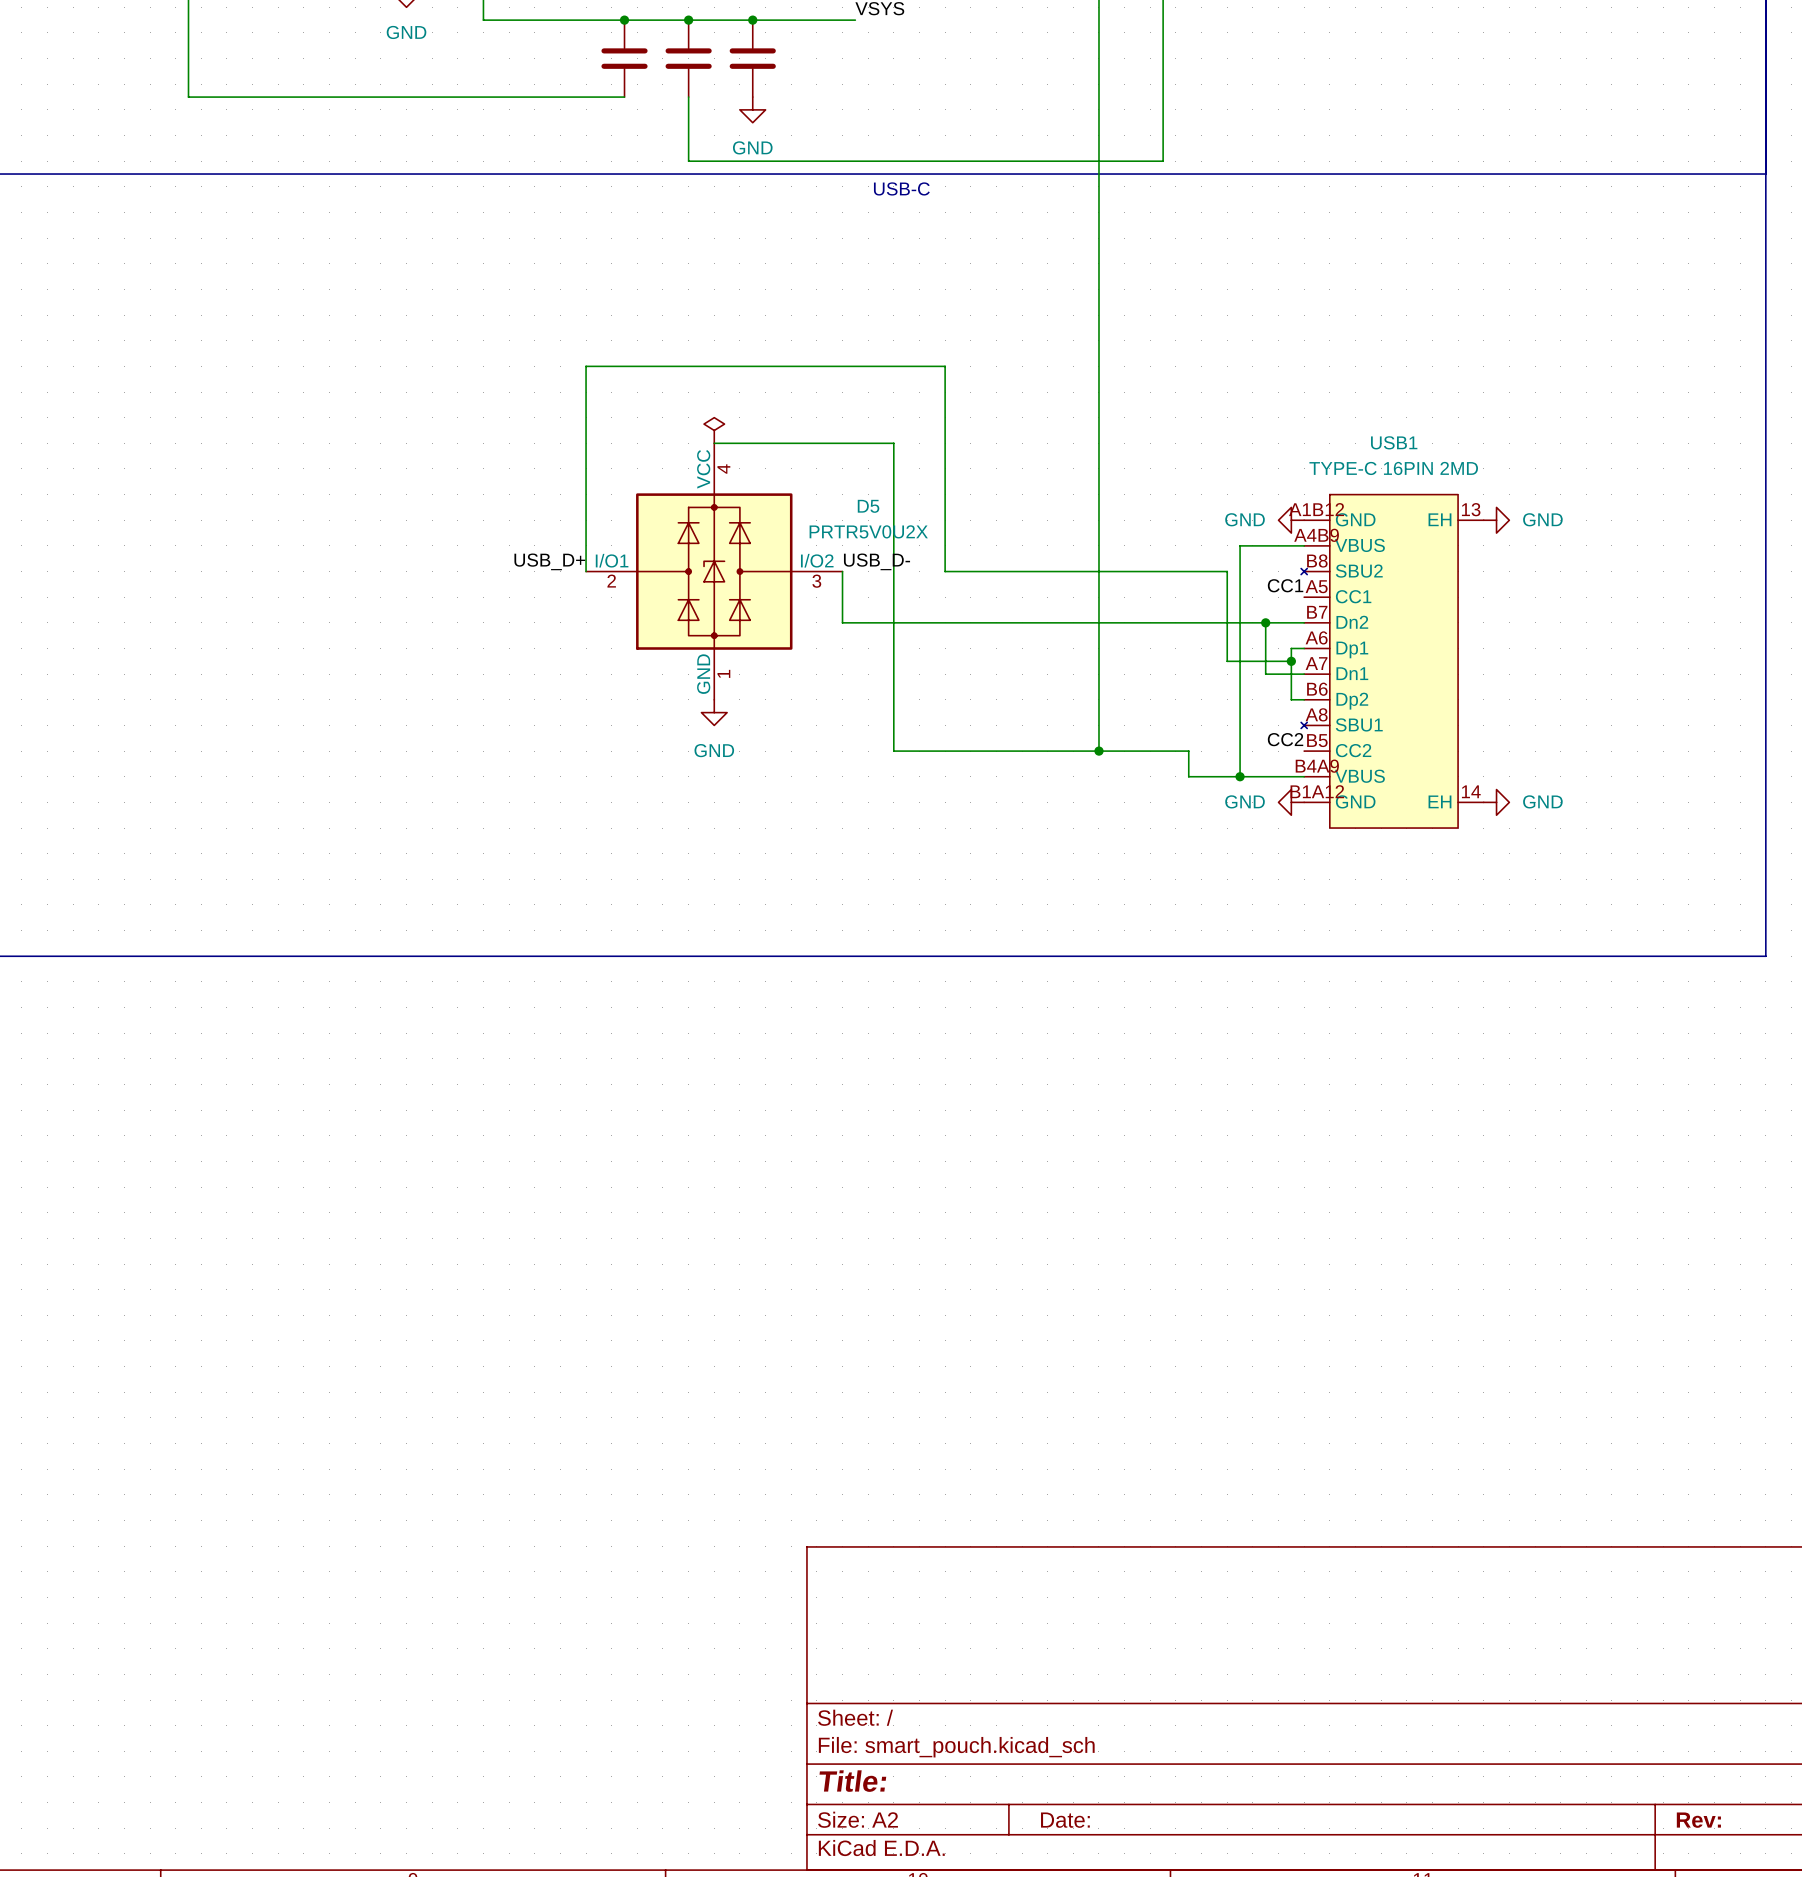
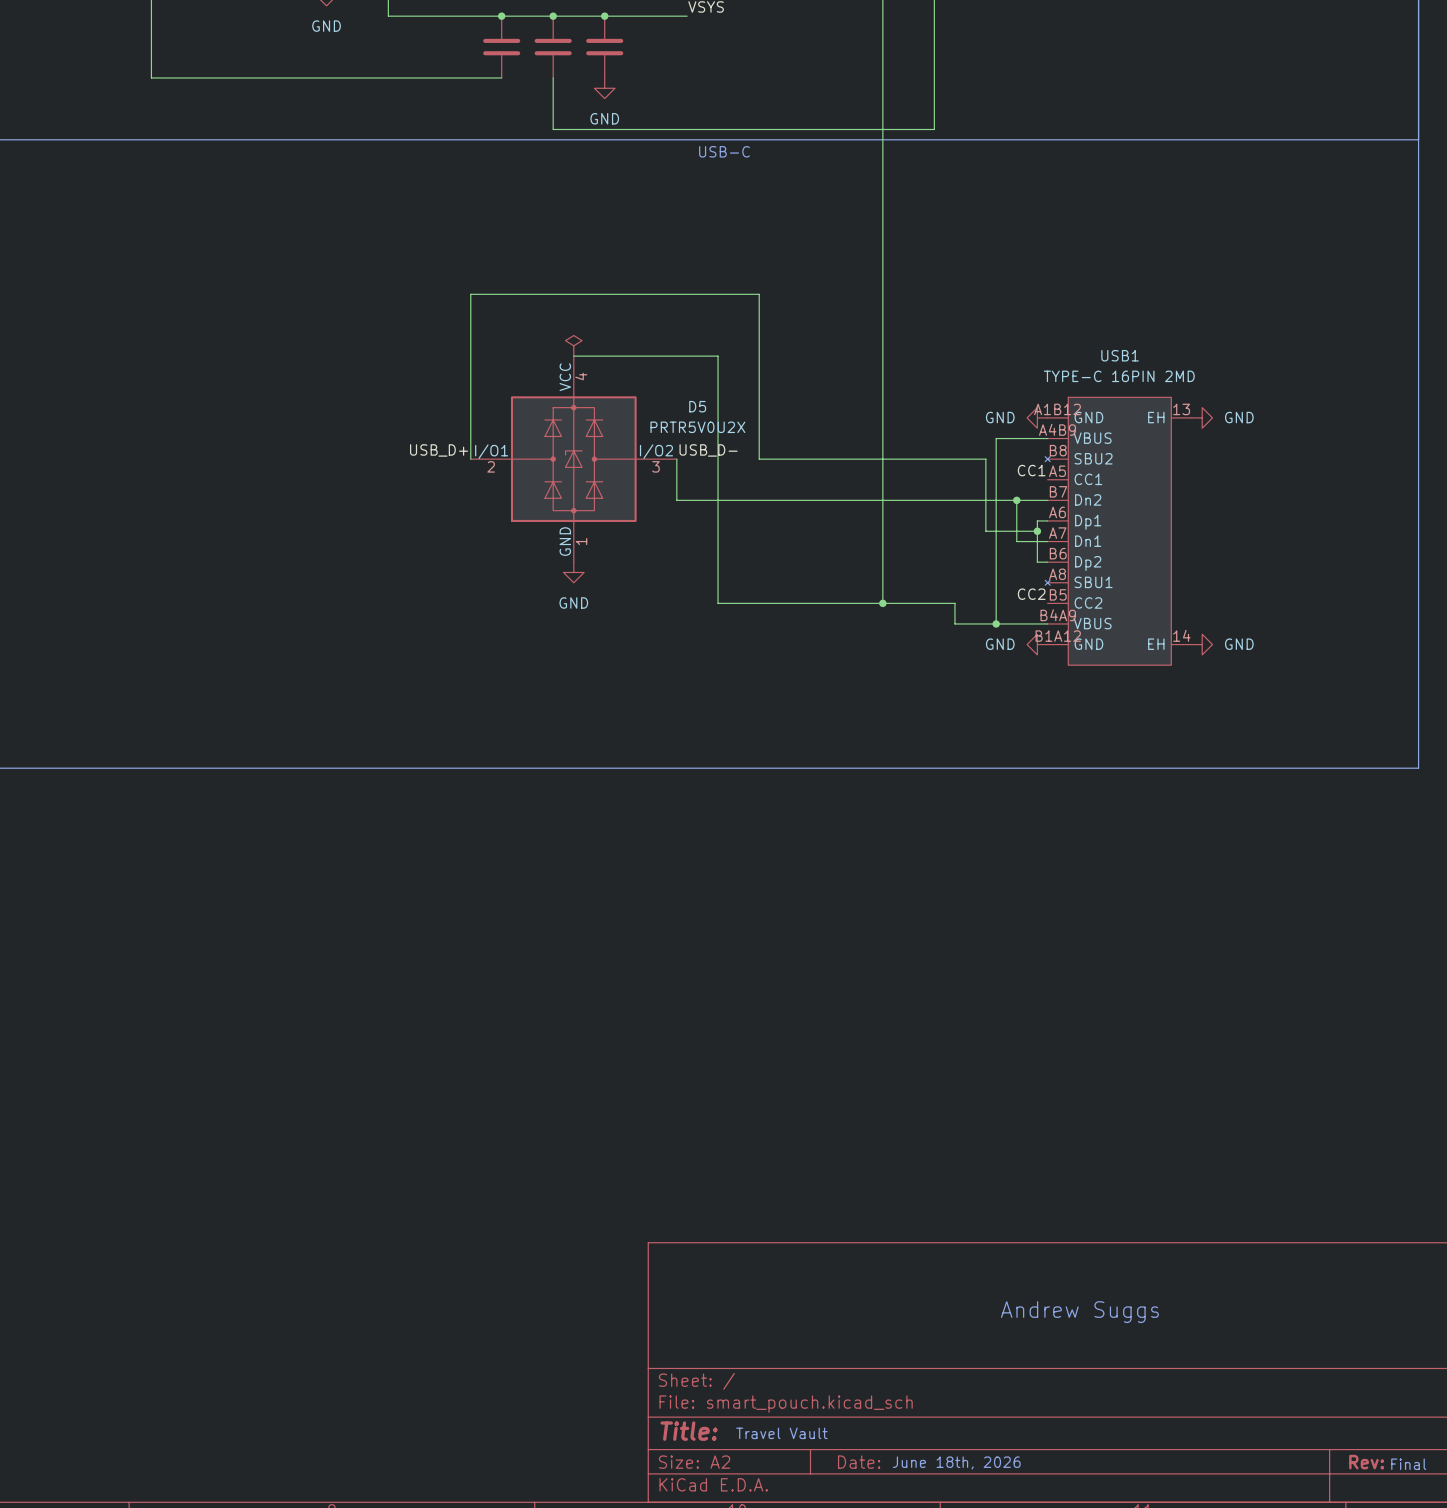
text: none -> Andrew Suggs (1079, 1312)
text: none -> Travel Vault (781, 1433)
text: none -> June 18th, 2026 (956, 1462)
text: none -> Final (1408, 1464)

